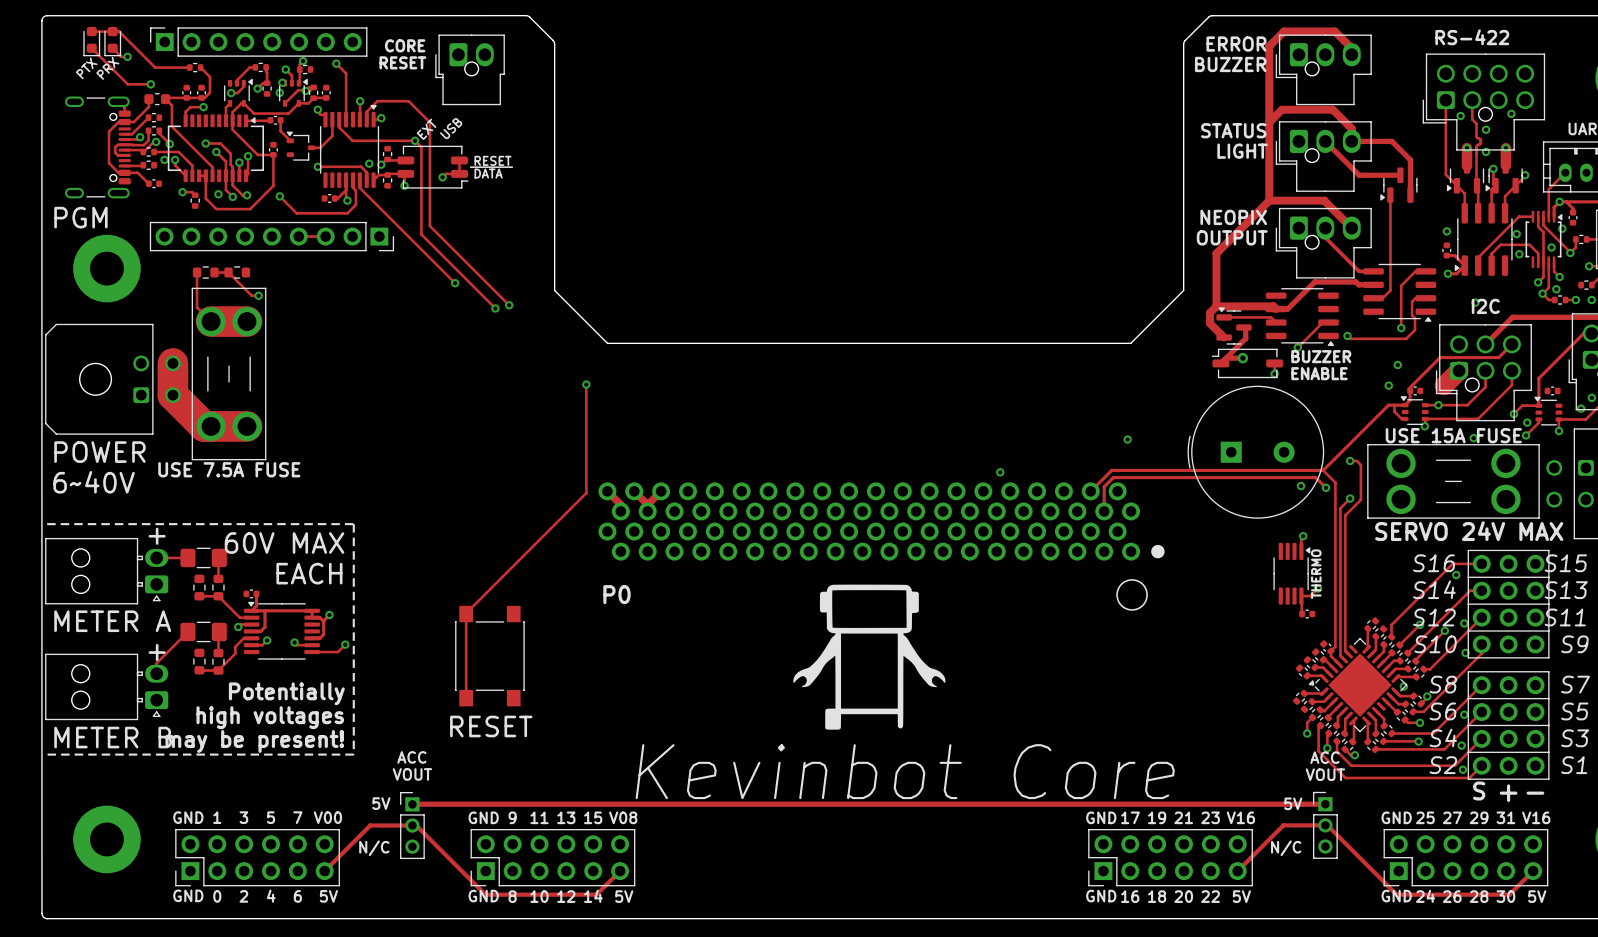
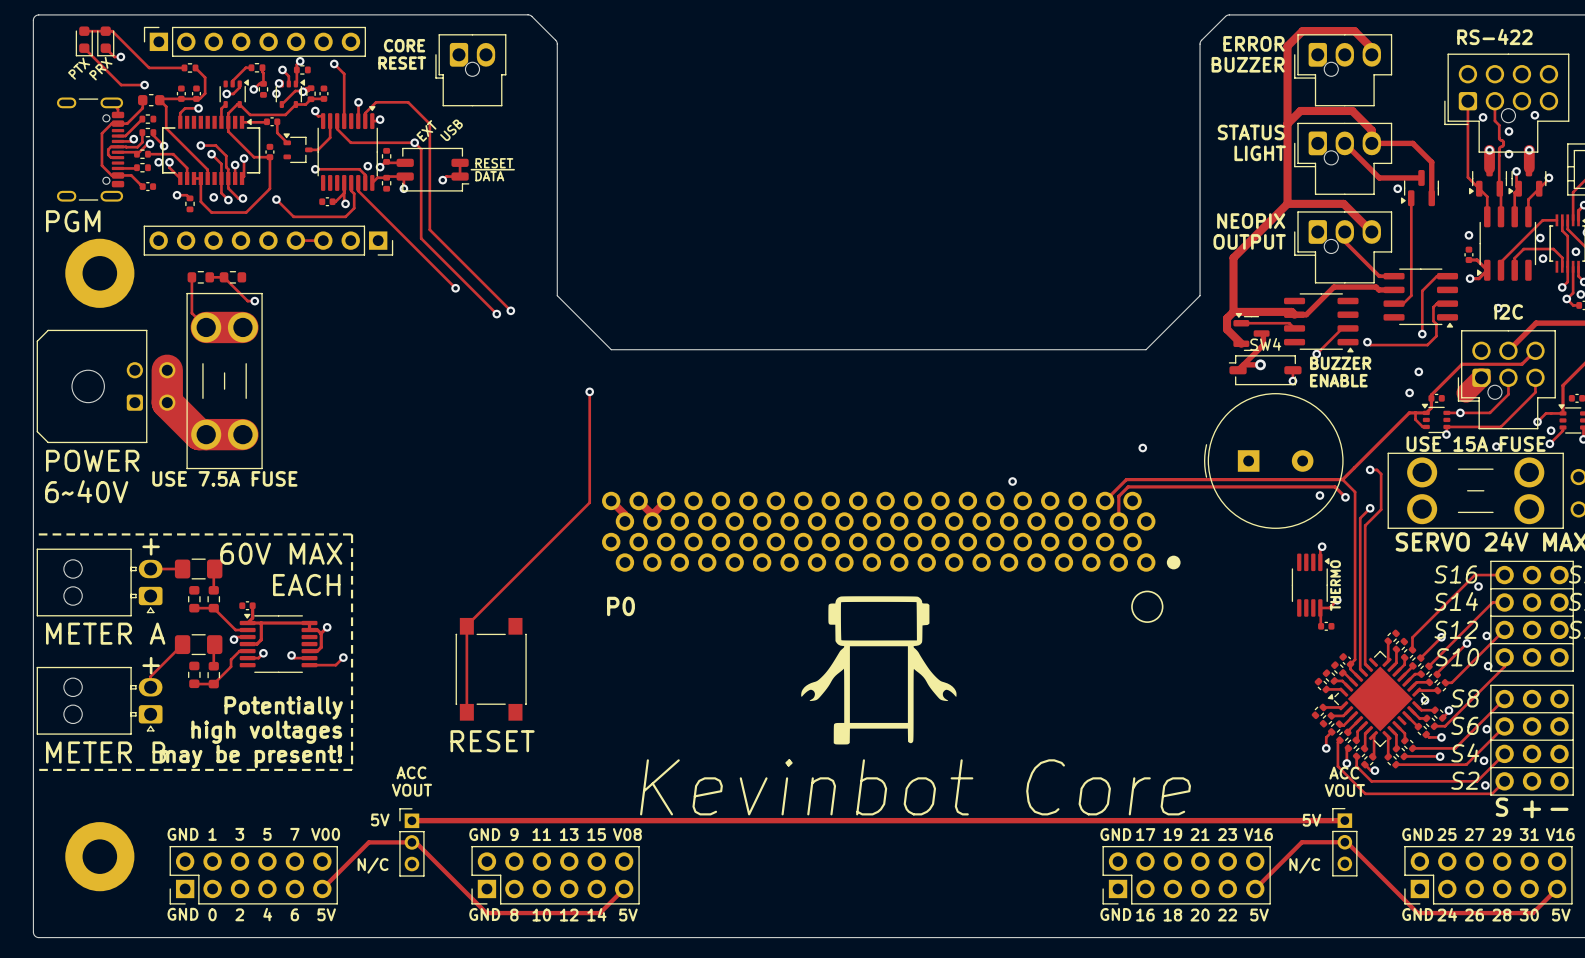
via: none -> (1397, 188)
SW4 name: none -> SW4 (1265, 344)

